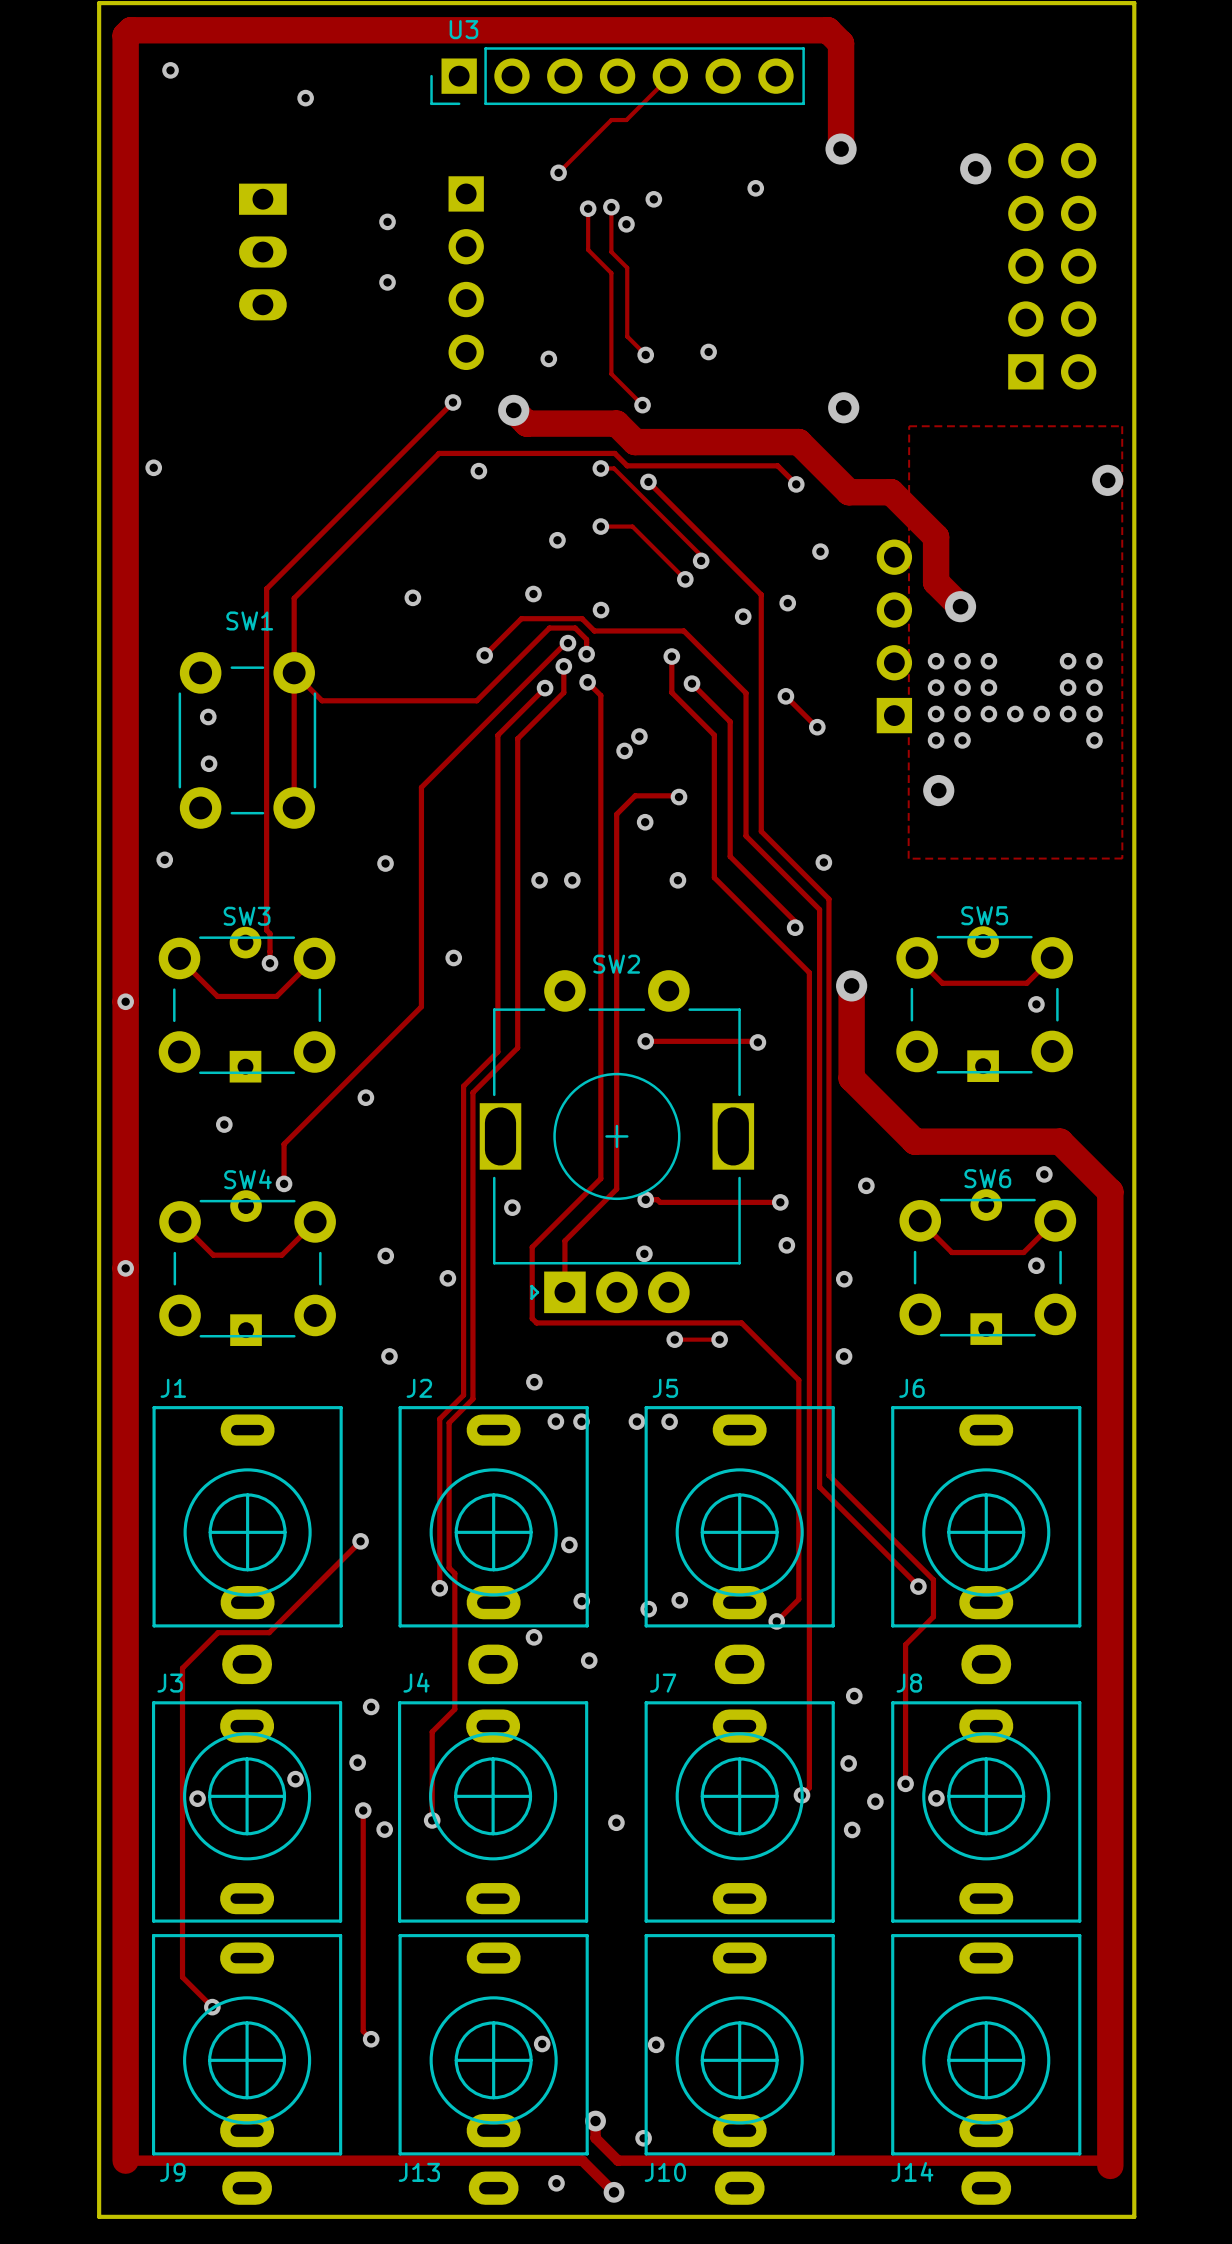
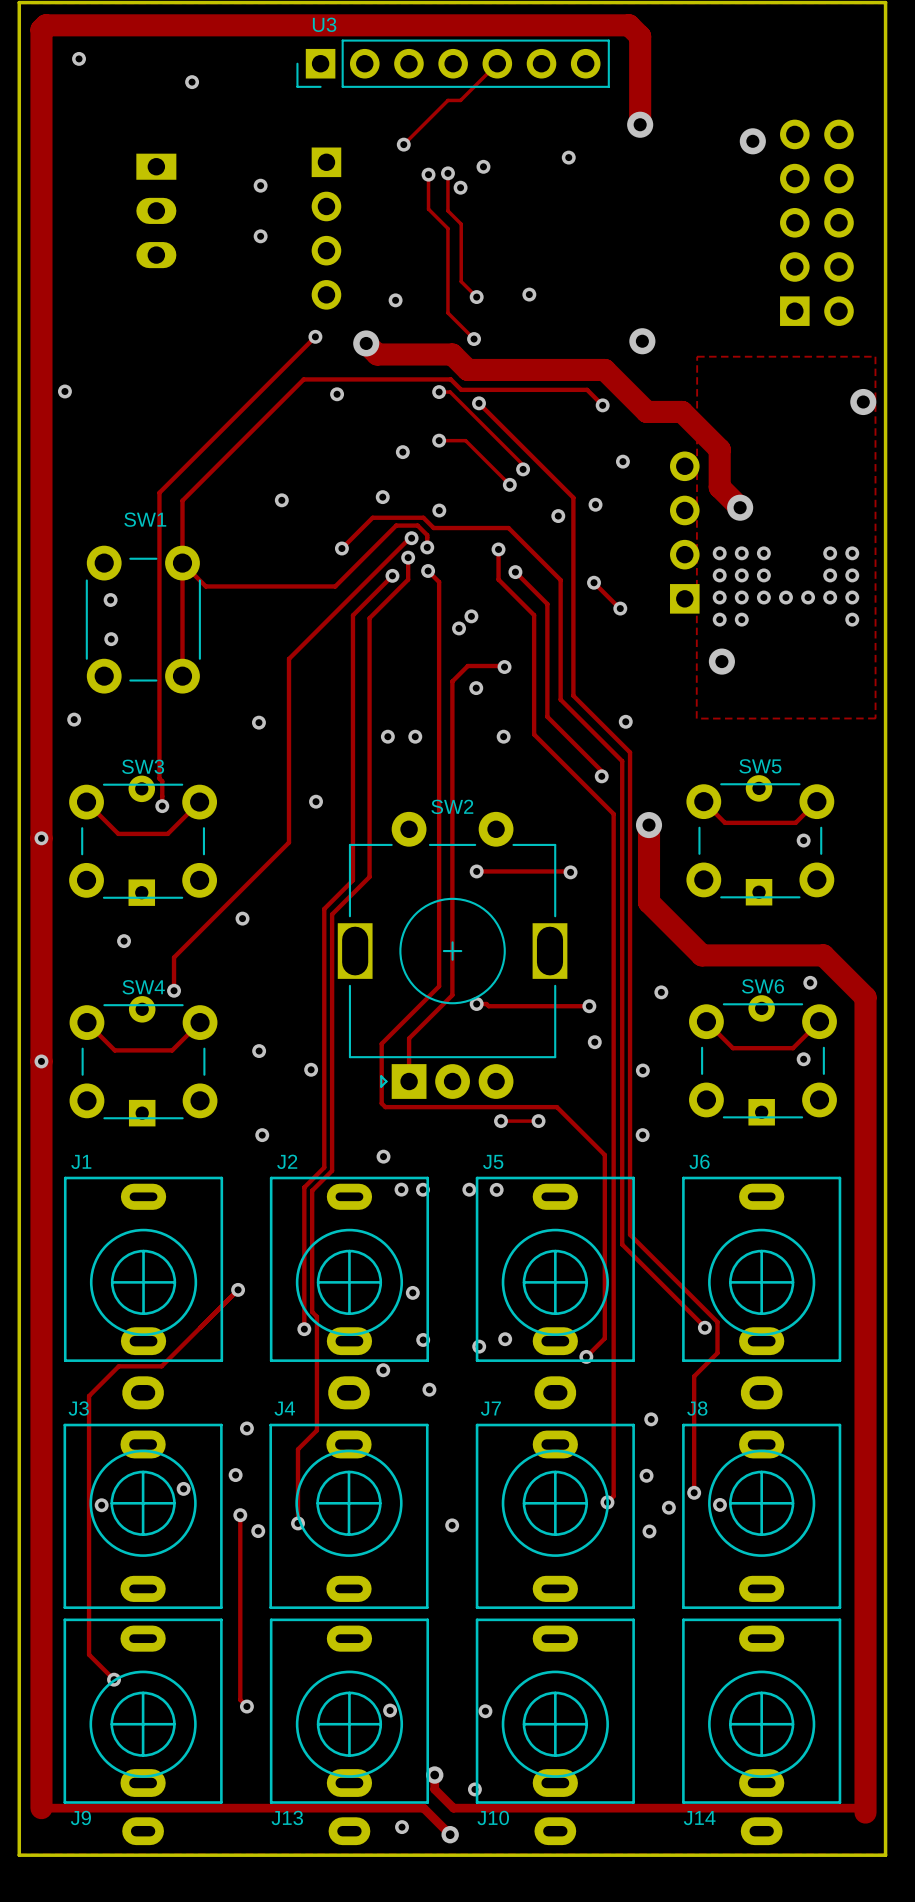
via: (512, 1207) -> none
via: (644, 1253) -> none

